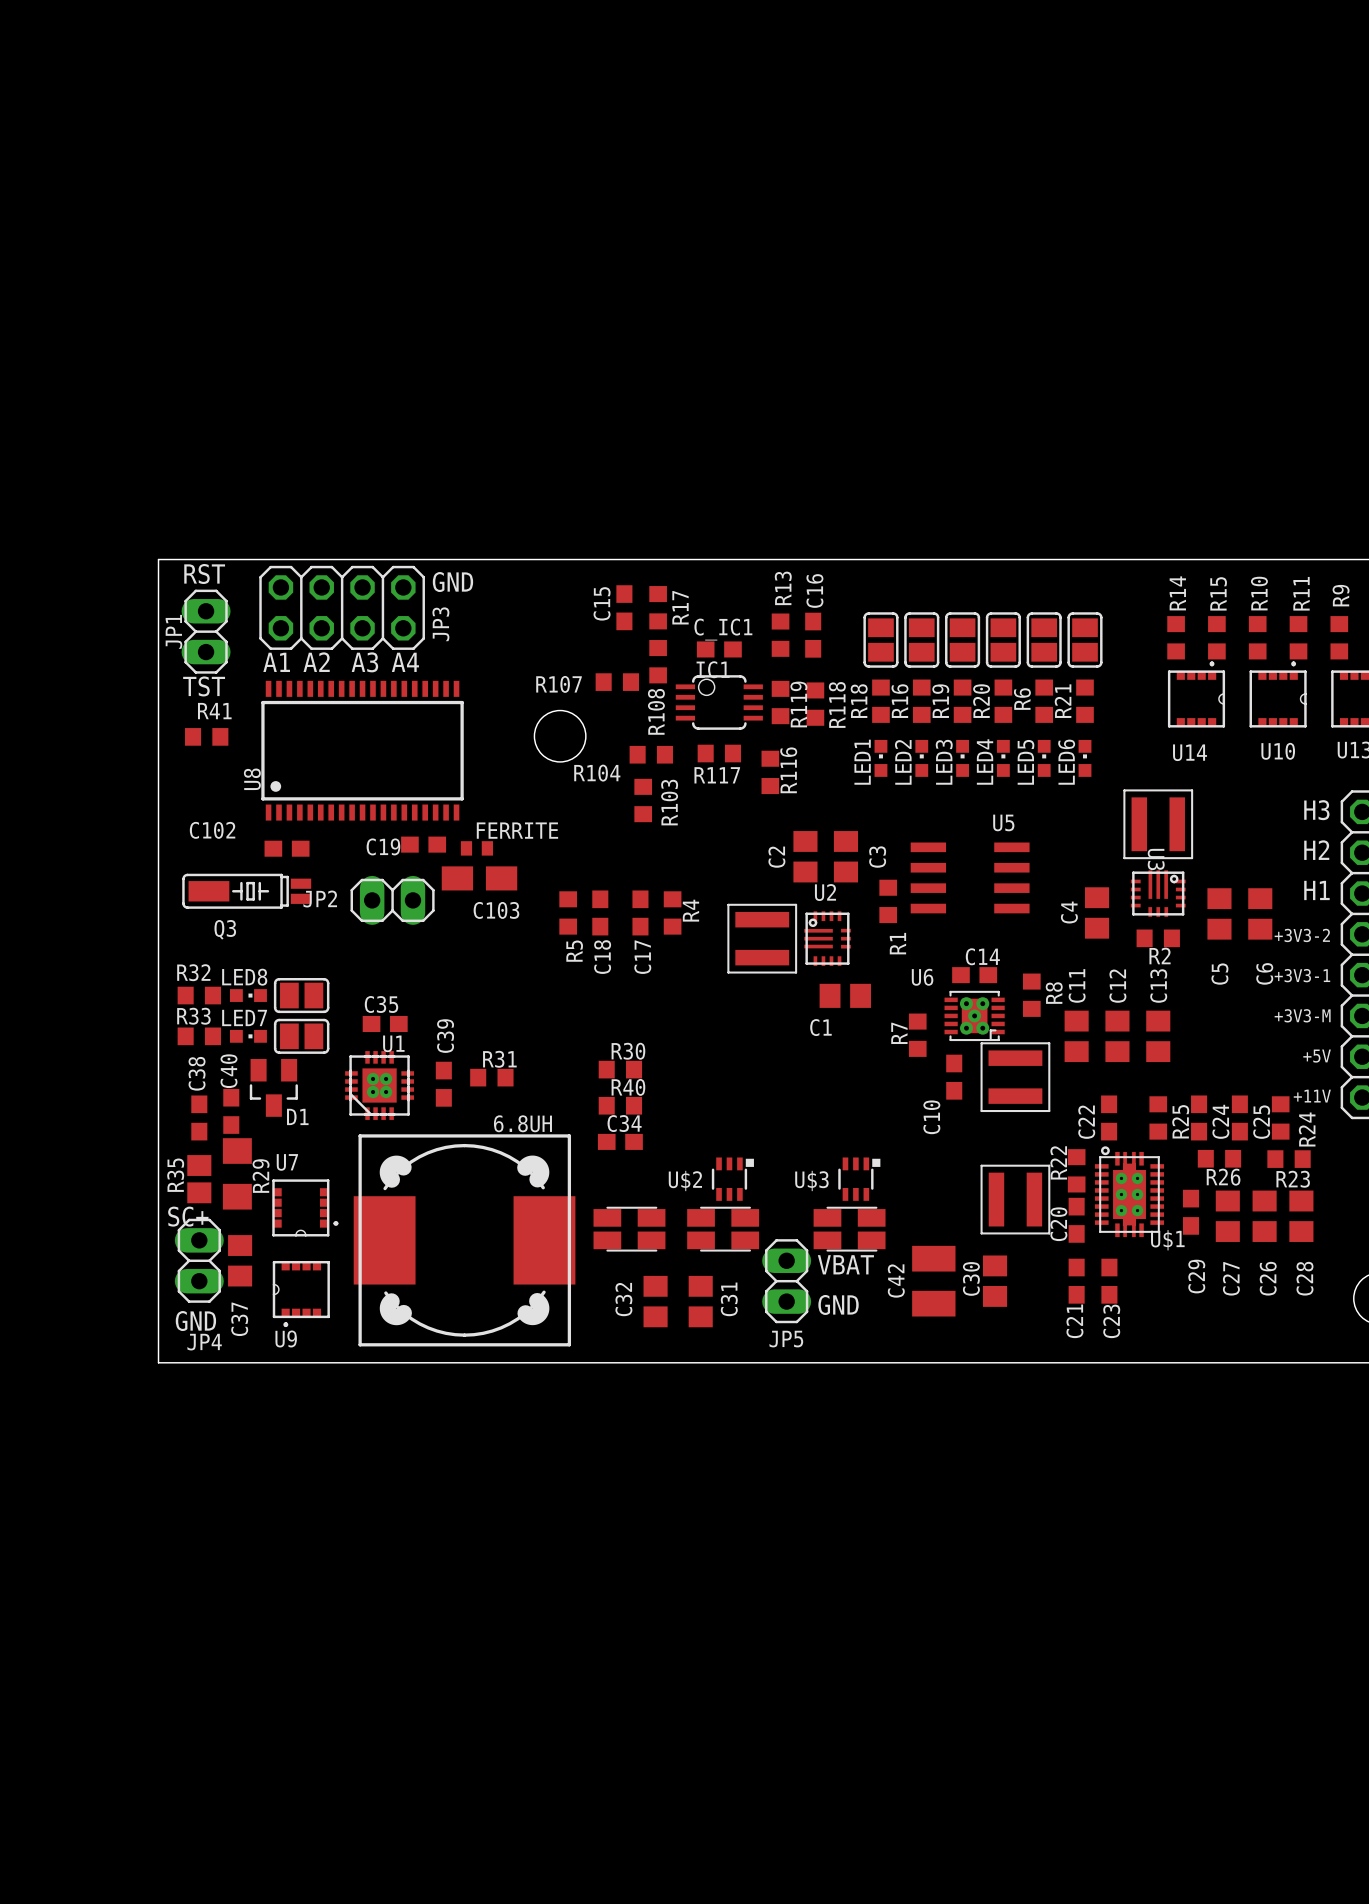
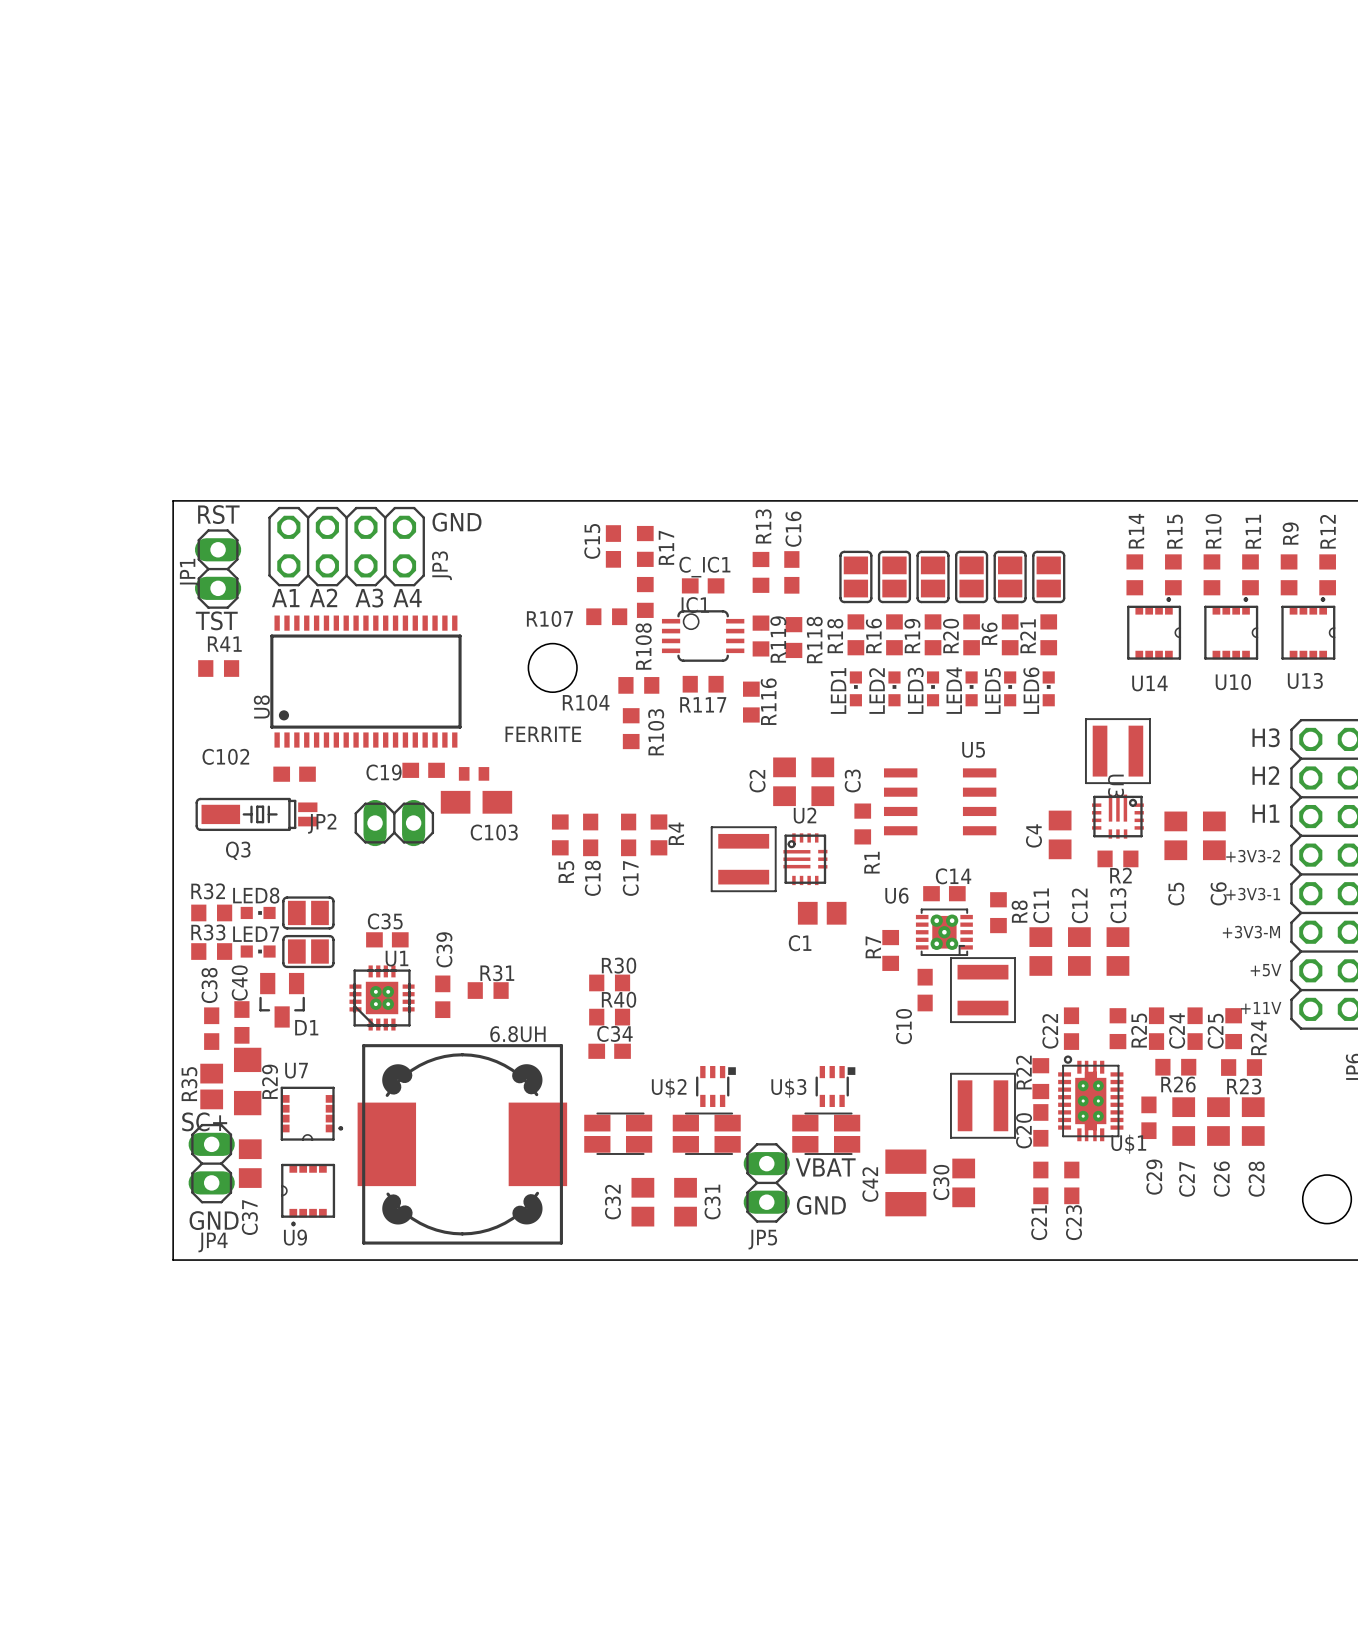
FERRITE name position: FERRITE (517, 830) -> FERRITE (543, 734)

